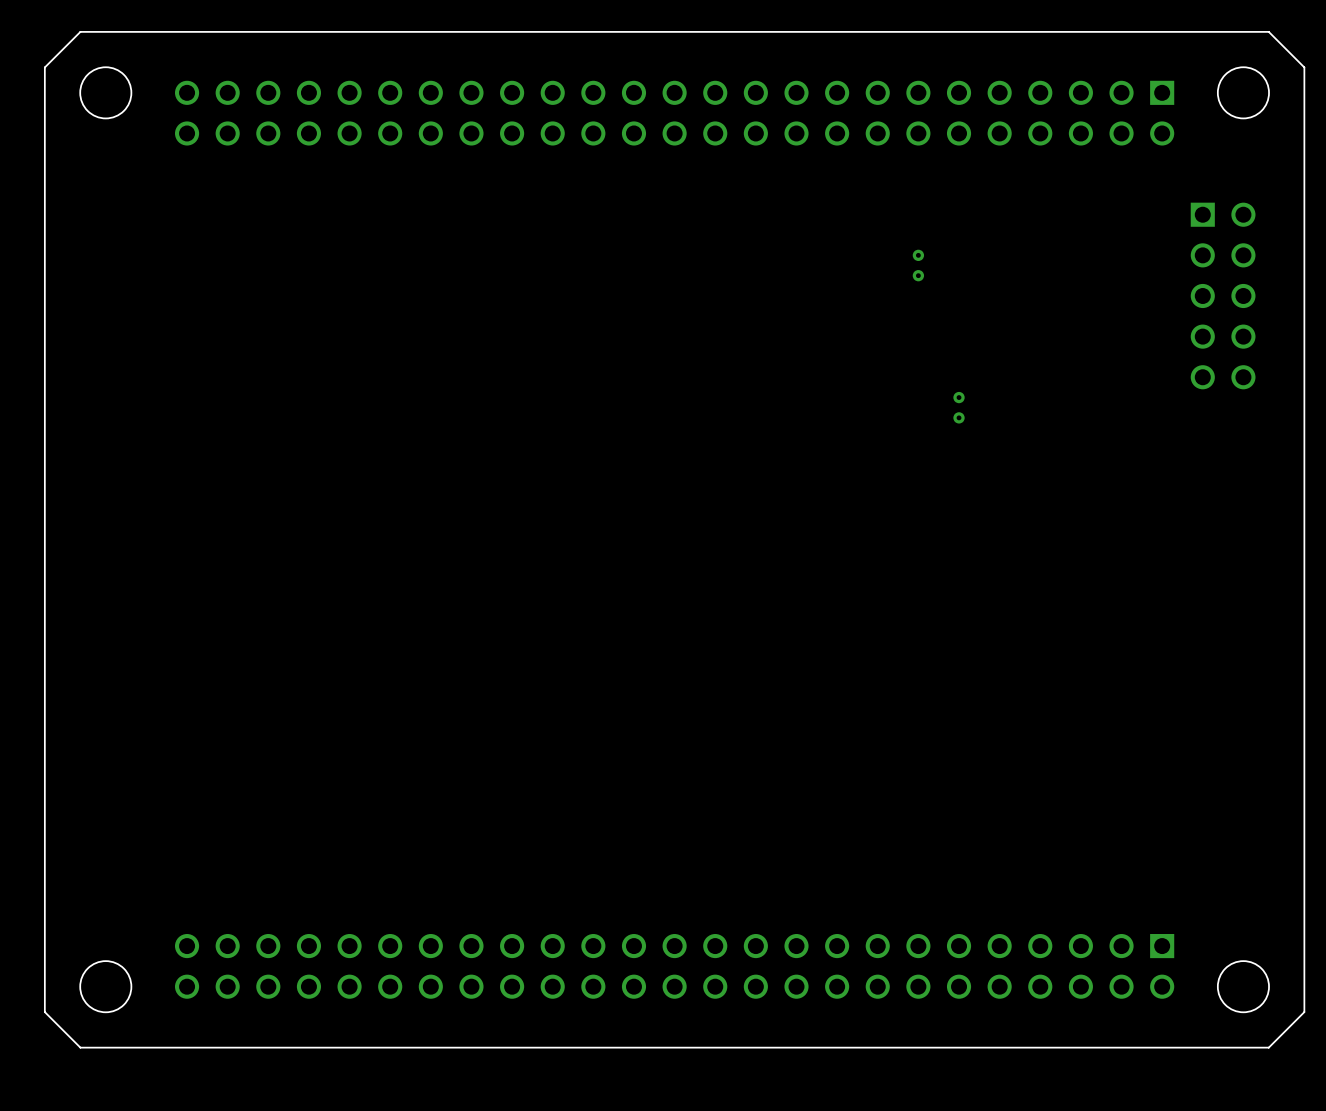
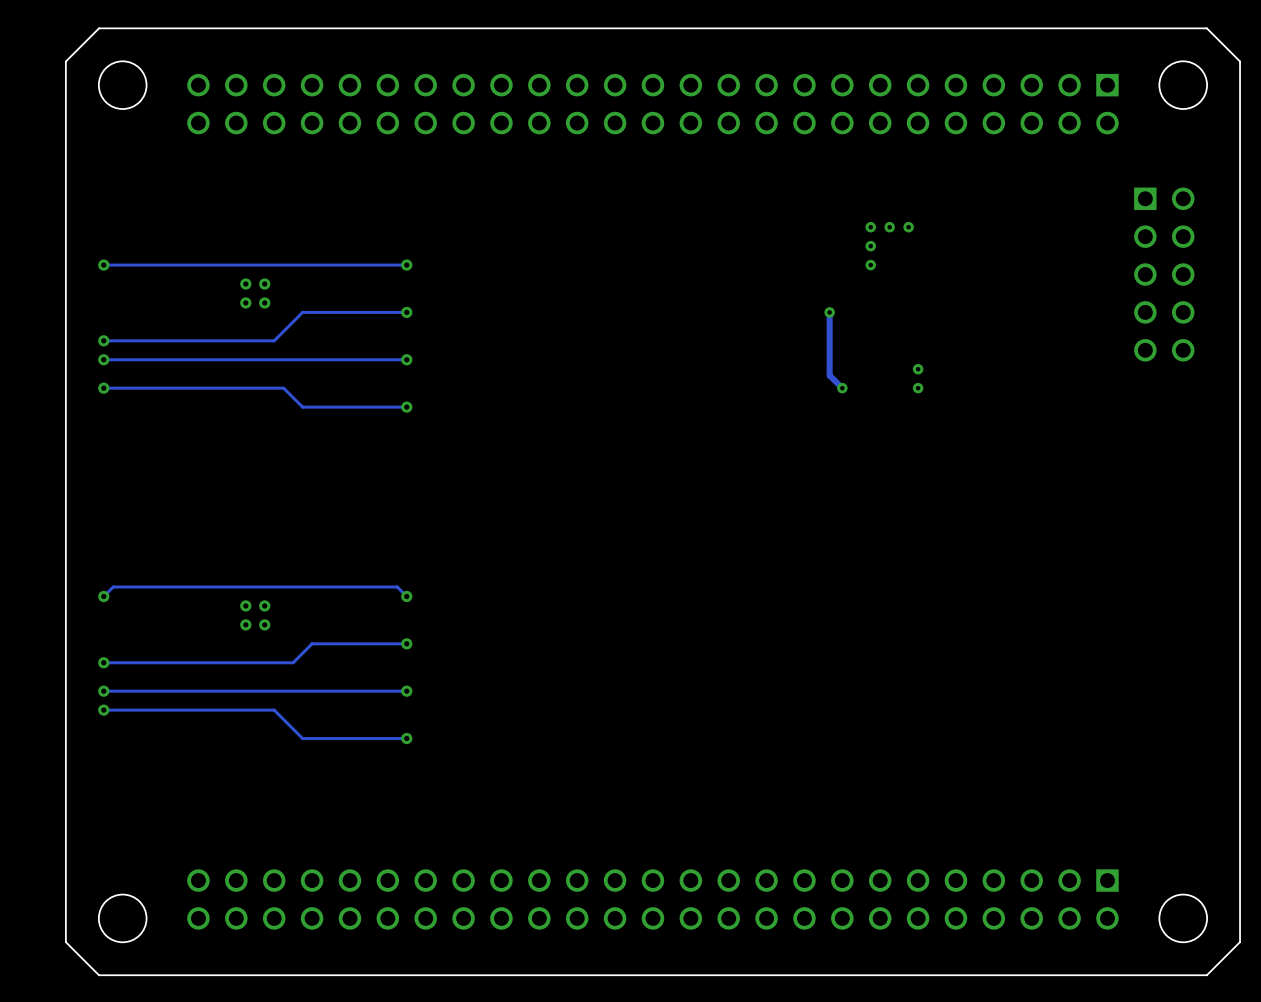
via: none -> (870, 227)
via: none -> (889, 227)
via: none -> (908, 227)
via: (918, 255) -> none
via: none -> (870, 246)
via: (918, 275) -> none
via: none -> (103, 265)
track: none -> (406, 265) (103, 265)
via: none -> (406, 265)
via: none -> (870, 265)
via: none -> (245, 284)
via: none -> (264, 284)
via: none -> (245, 302)
via: none -> (264, 302)
track: none -> (406, 312) (302, 312) (274, 340) (103, 340)
via: none -> (406, 312)
track: none -> (829, 312) (829, 375) (842, 388)
via: none -> (829, 312)
via: none -> (103, 340)
via: none -> (103, 359)
track: none -> (406, 359) (103, 359)
via: none -> (406, 359)
track: none -> (103, 388) (283, 388) (302, 407) (406, 407)
via: none -> (103, 388)
via: none -> (842, 388)
via: none -> (406, 407)
via: none -> (103, 596)
track: none -> (406, 596) (397, 587) (113, 587) (103, 596)
via: none -> (406, 596)
via: none -> (245, 605)
via: none -> (264, 605)
via: none -> (245, 624)
via: none -> (264, 624)
track: none -> (406, 643) (312, 643) (293, 662) (103, 662)
via: none -> (406, 643)
via: none -> (103, 662)
via: none -> (103, 691)
track: none -> (406, 691) (103, 691)
via: none -> (406, 691)
track: none -> (103, 710) (274, 710) (302, 738) (406, 738)
via: none -> (103, 710)
via: none -> (406, 738)

